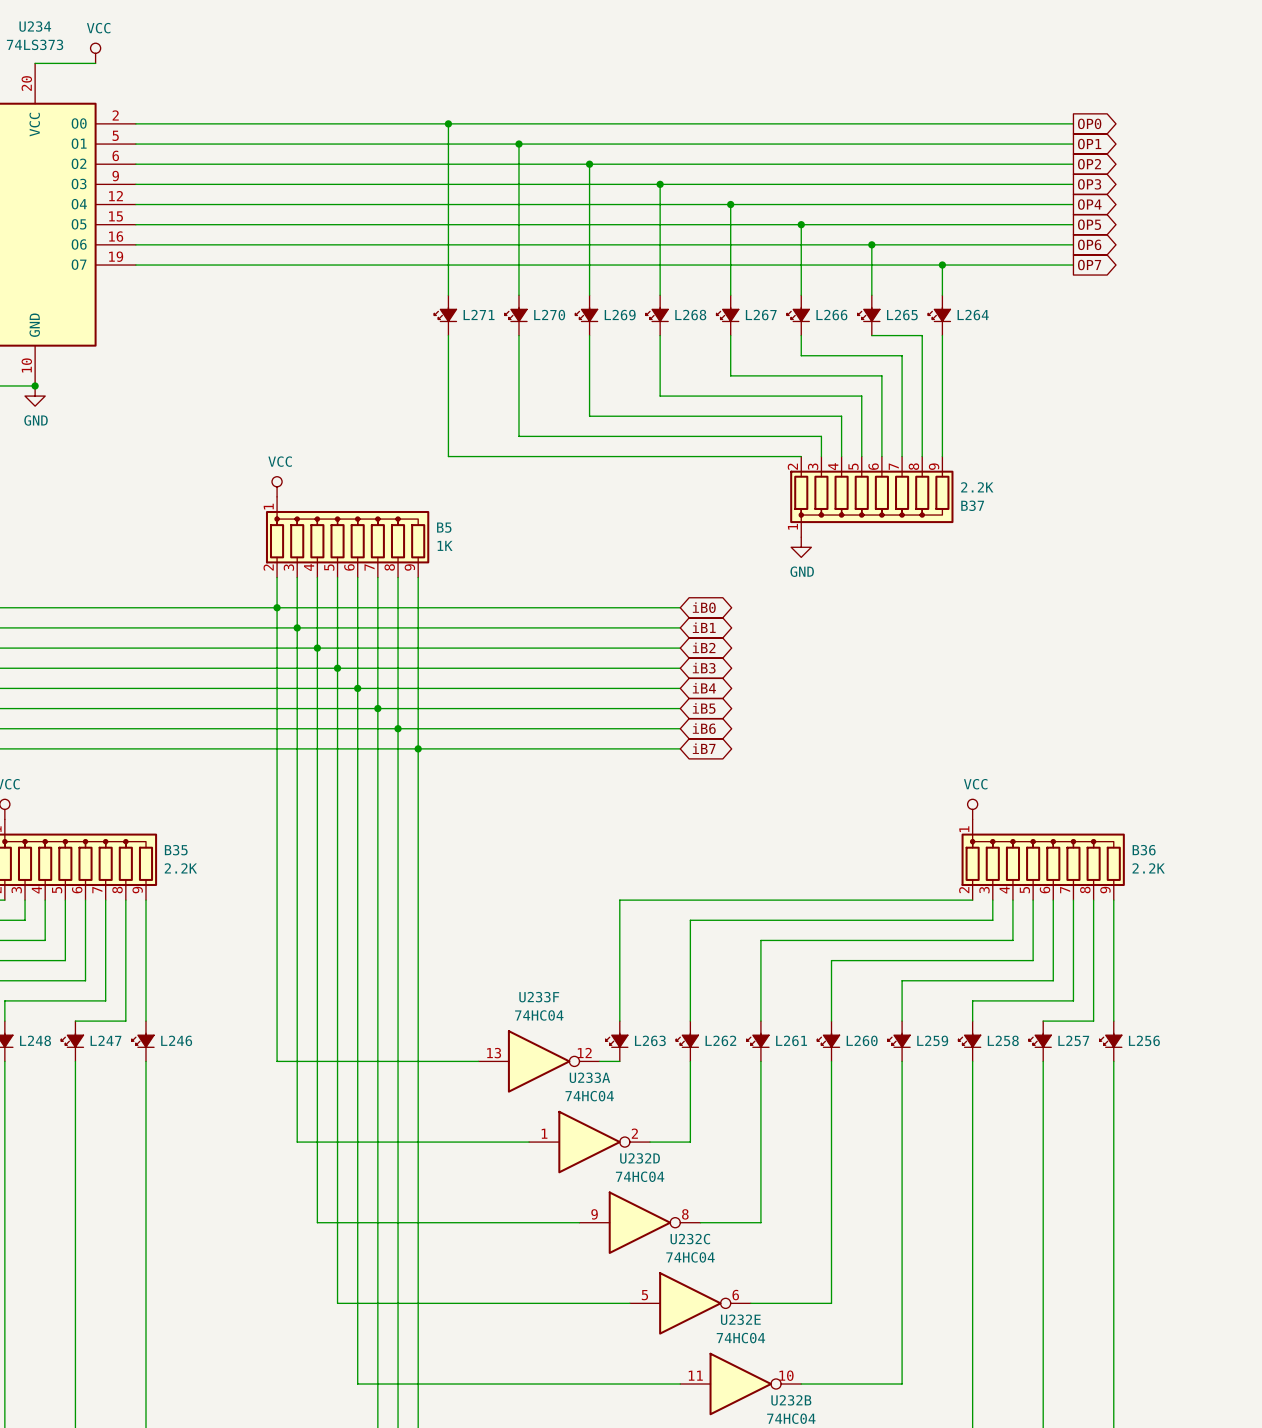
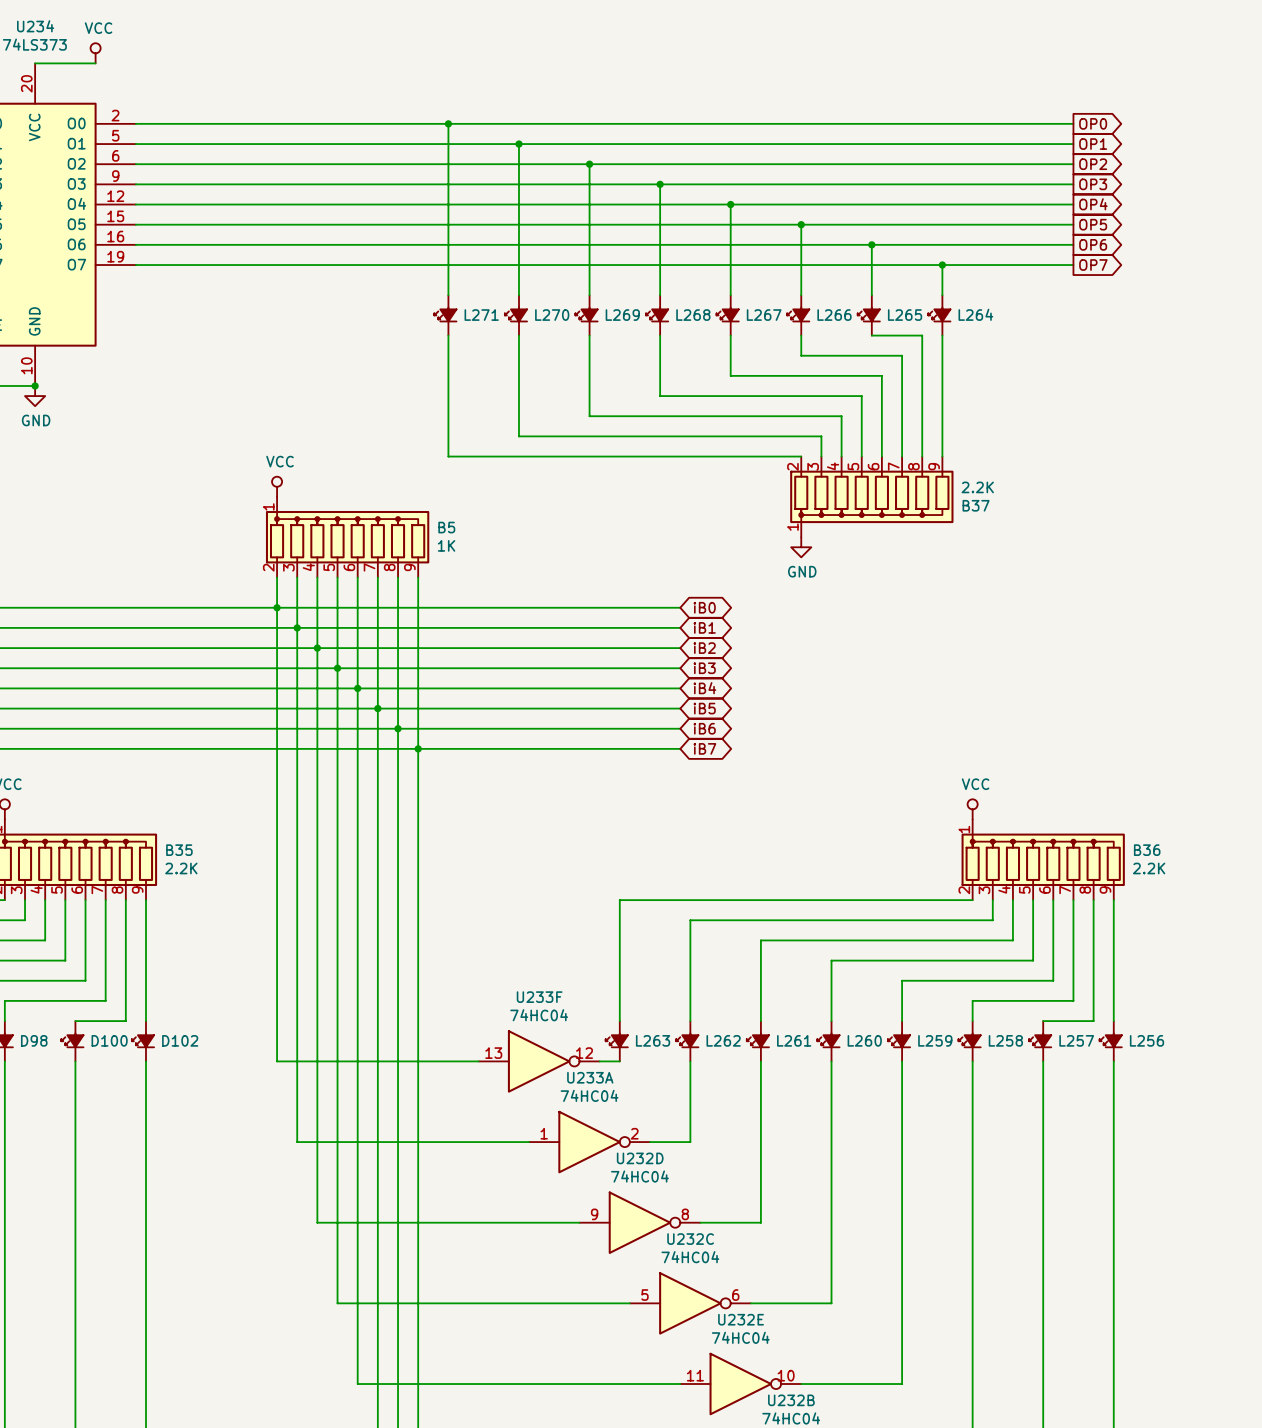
L248 name: L248 (35, 1040) -> D98 (34, 1040)
L247 name: L247 (106, 1040) -> D100 (109, 1040)
L246 name: L246 (176, 1040) -> D102 (180, 1040)

